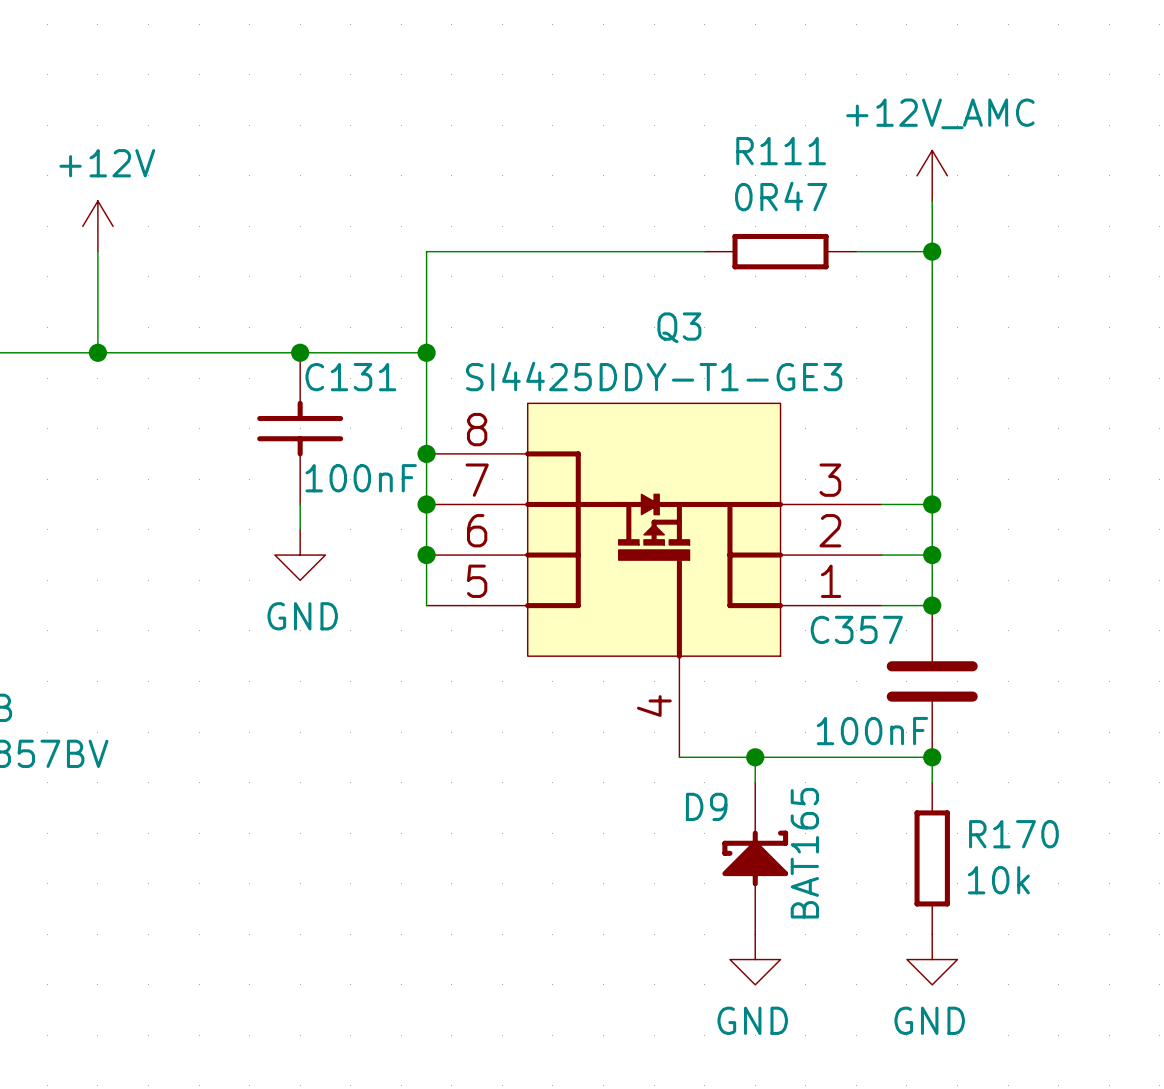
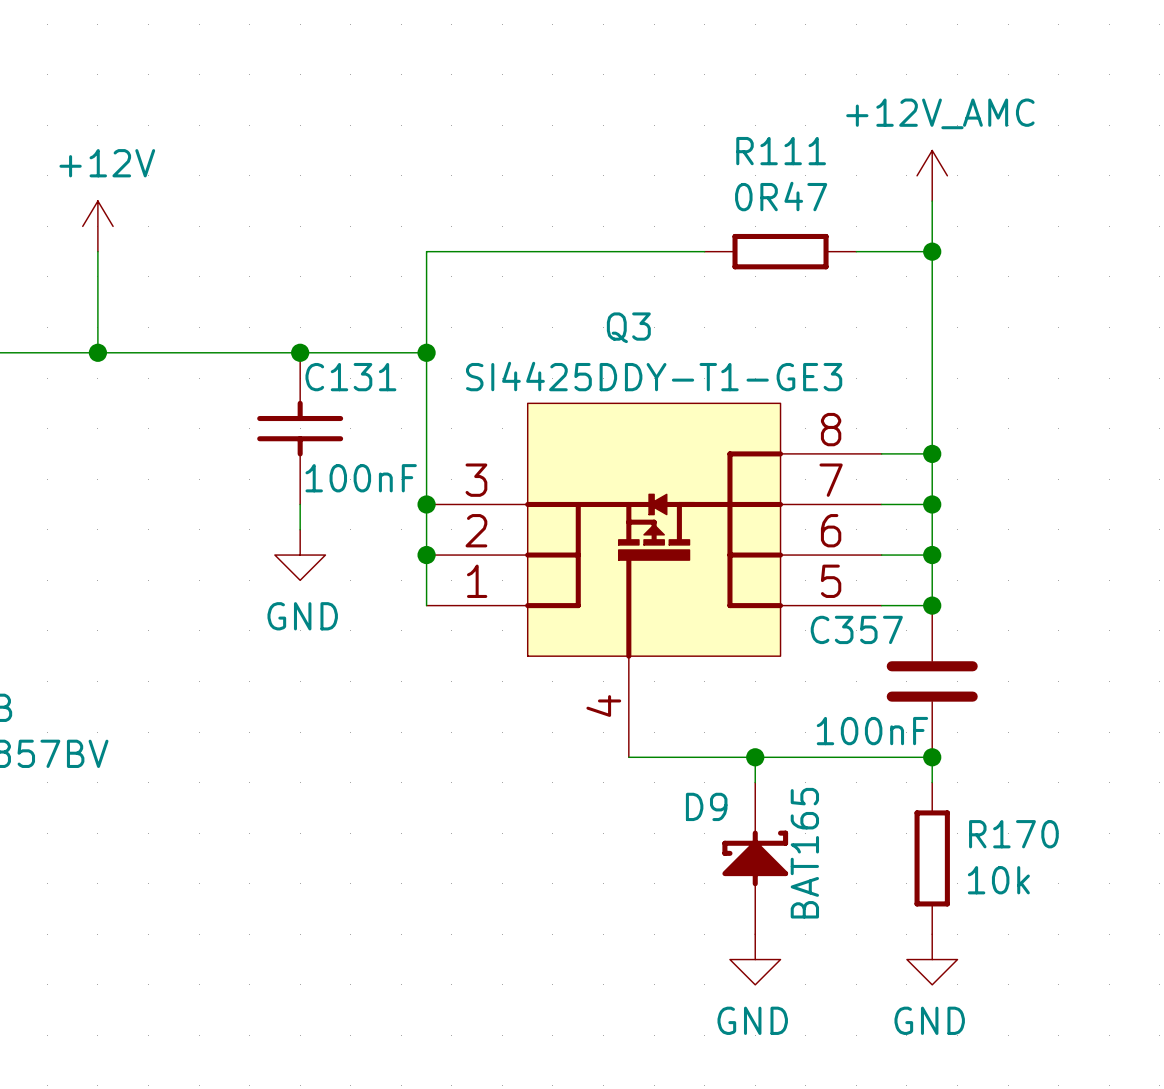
junction: (426, 453) -> none
wire: none -> (881, 453) (932, 453)
junction: none -> (932, 453)
Q3 flip: as is (654, 531) -> left-right (654, 531)
wire: none -> (628, 757) (679, 757)

